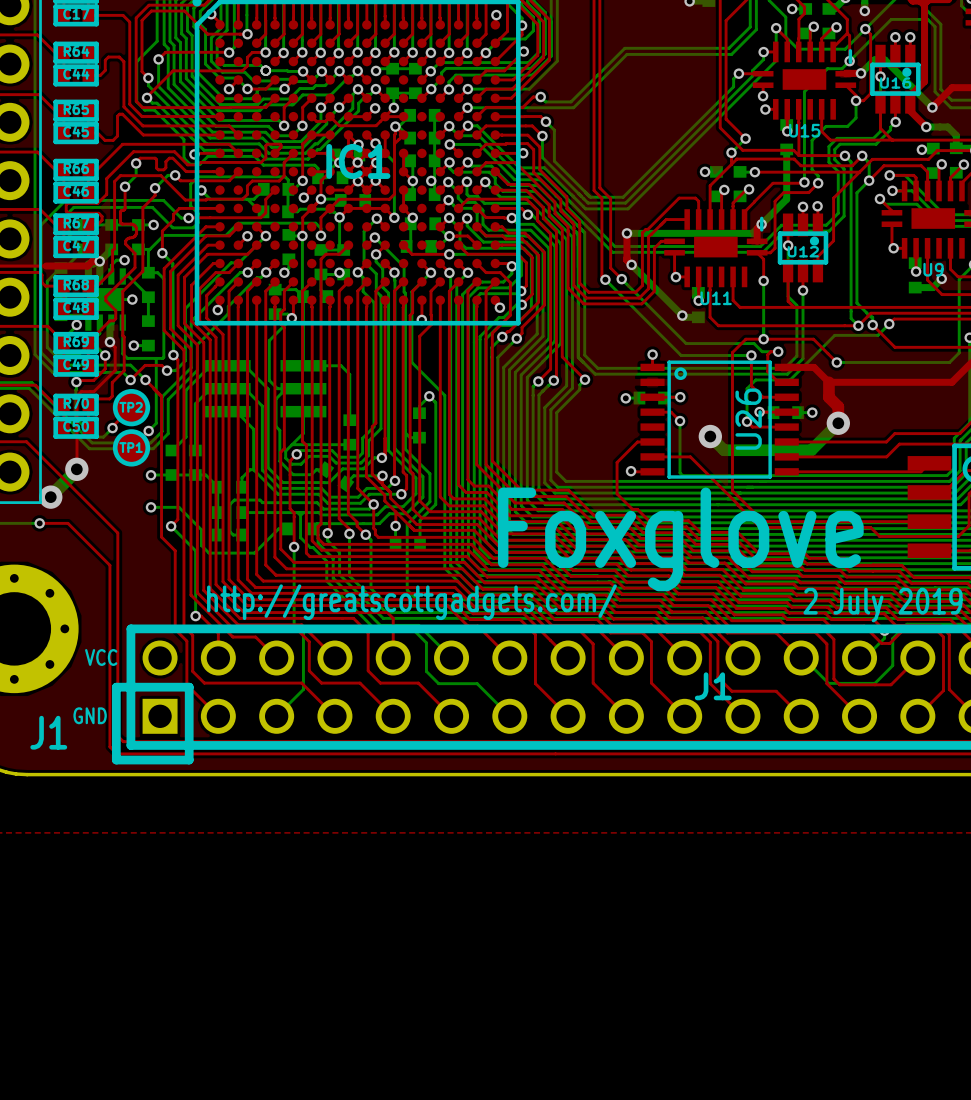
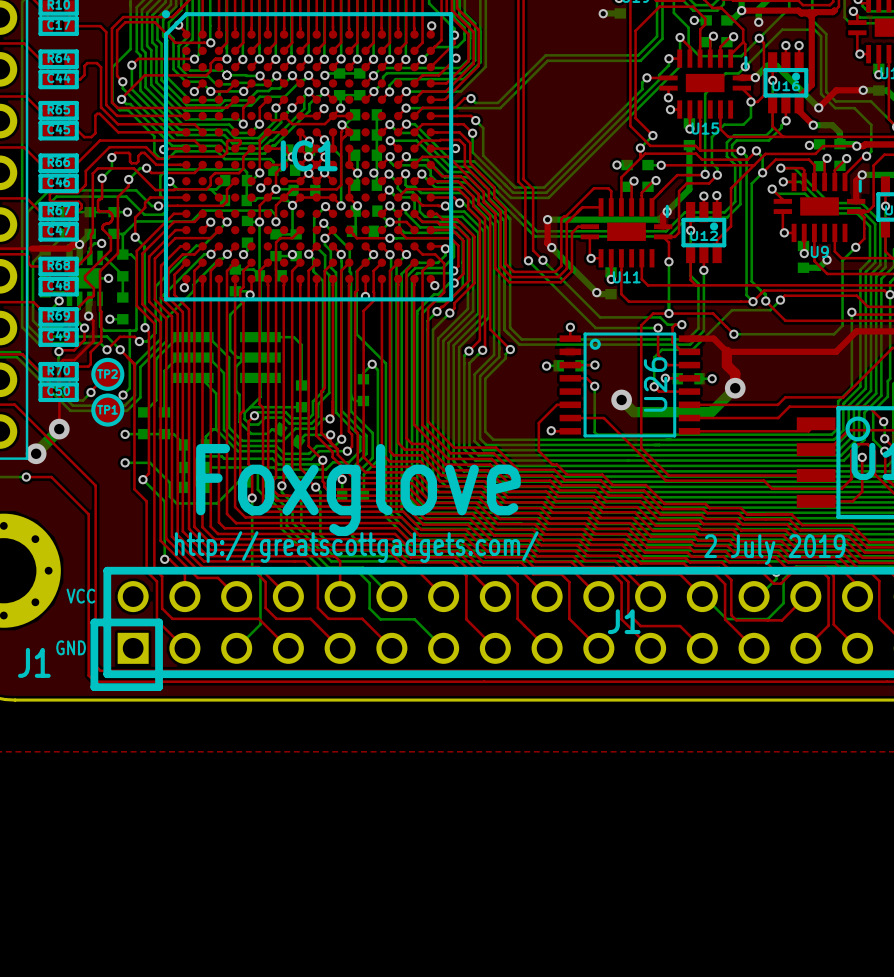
text position: Foxglove (680, 539) -> Foxglove (358, 490)

